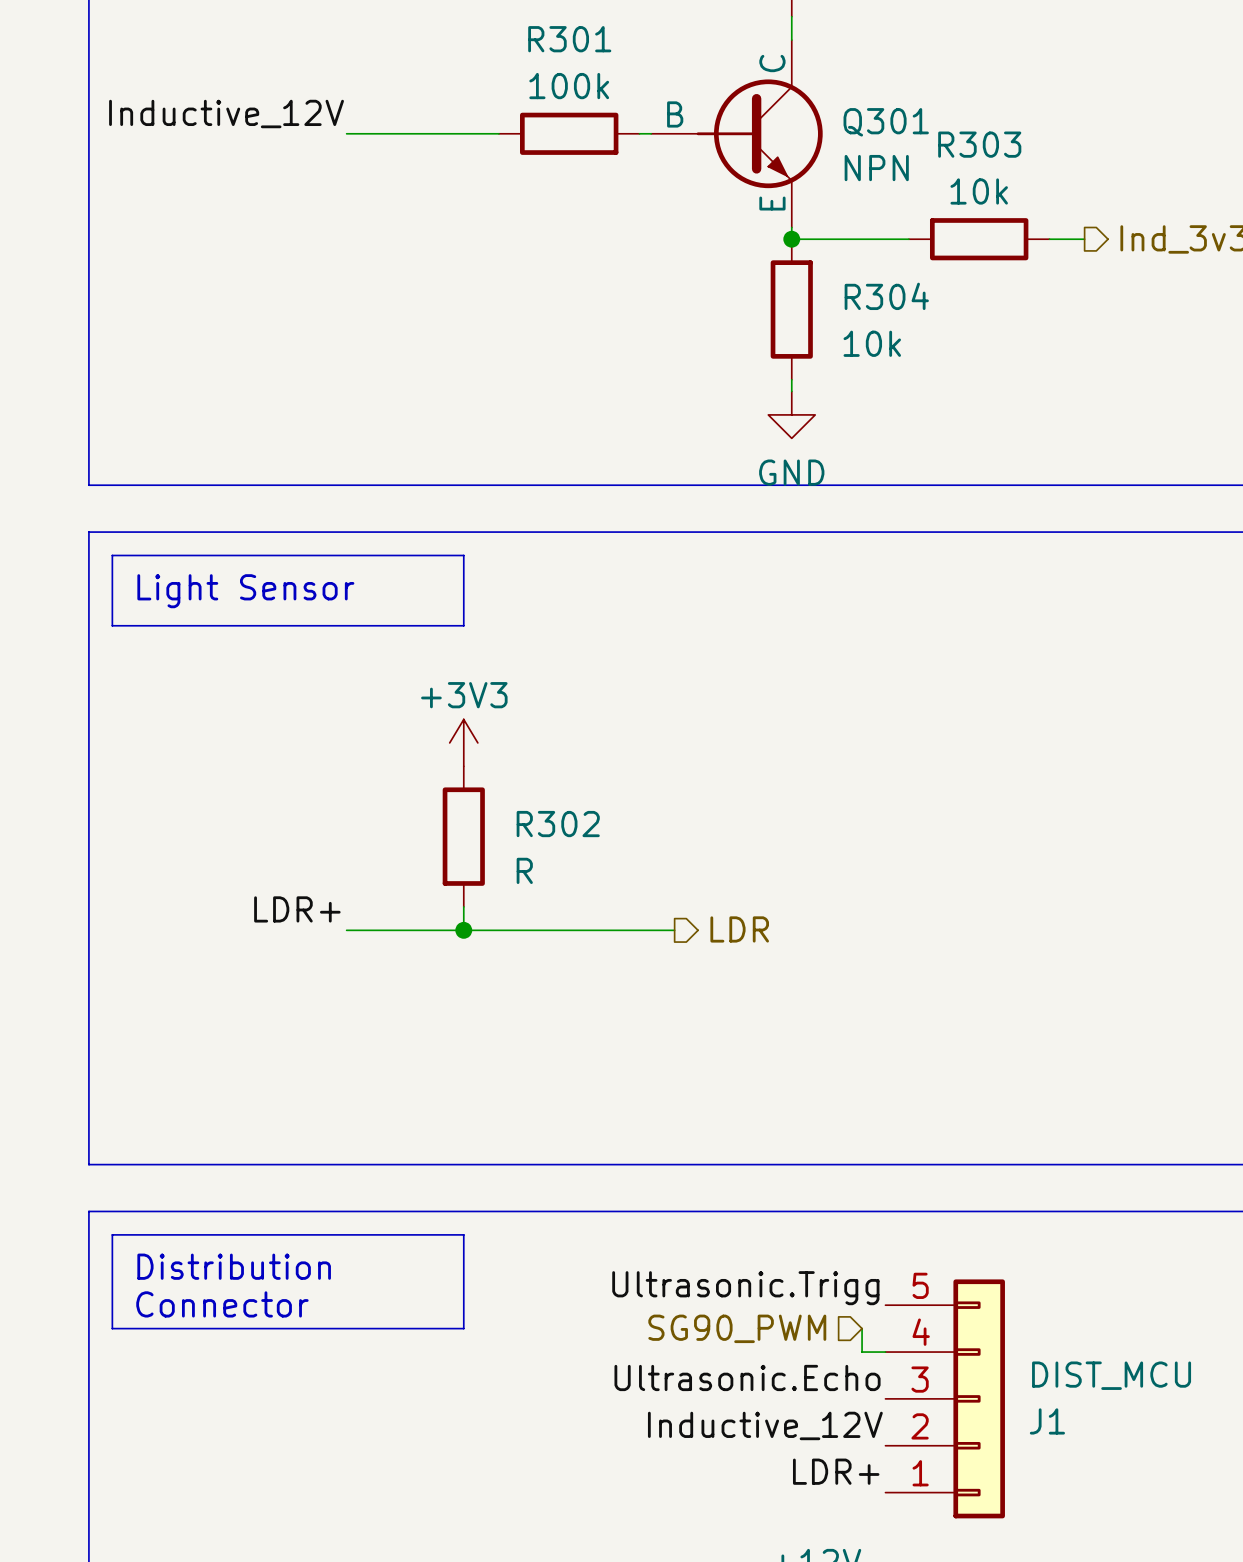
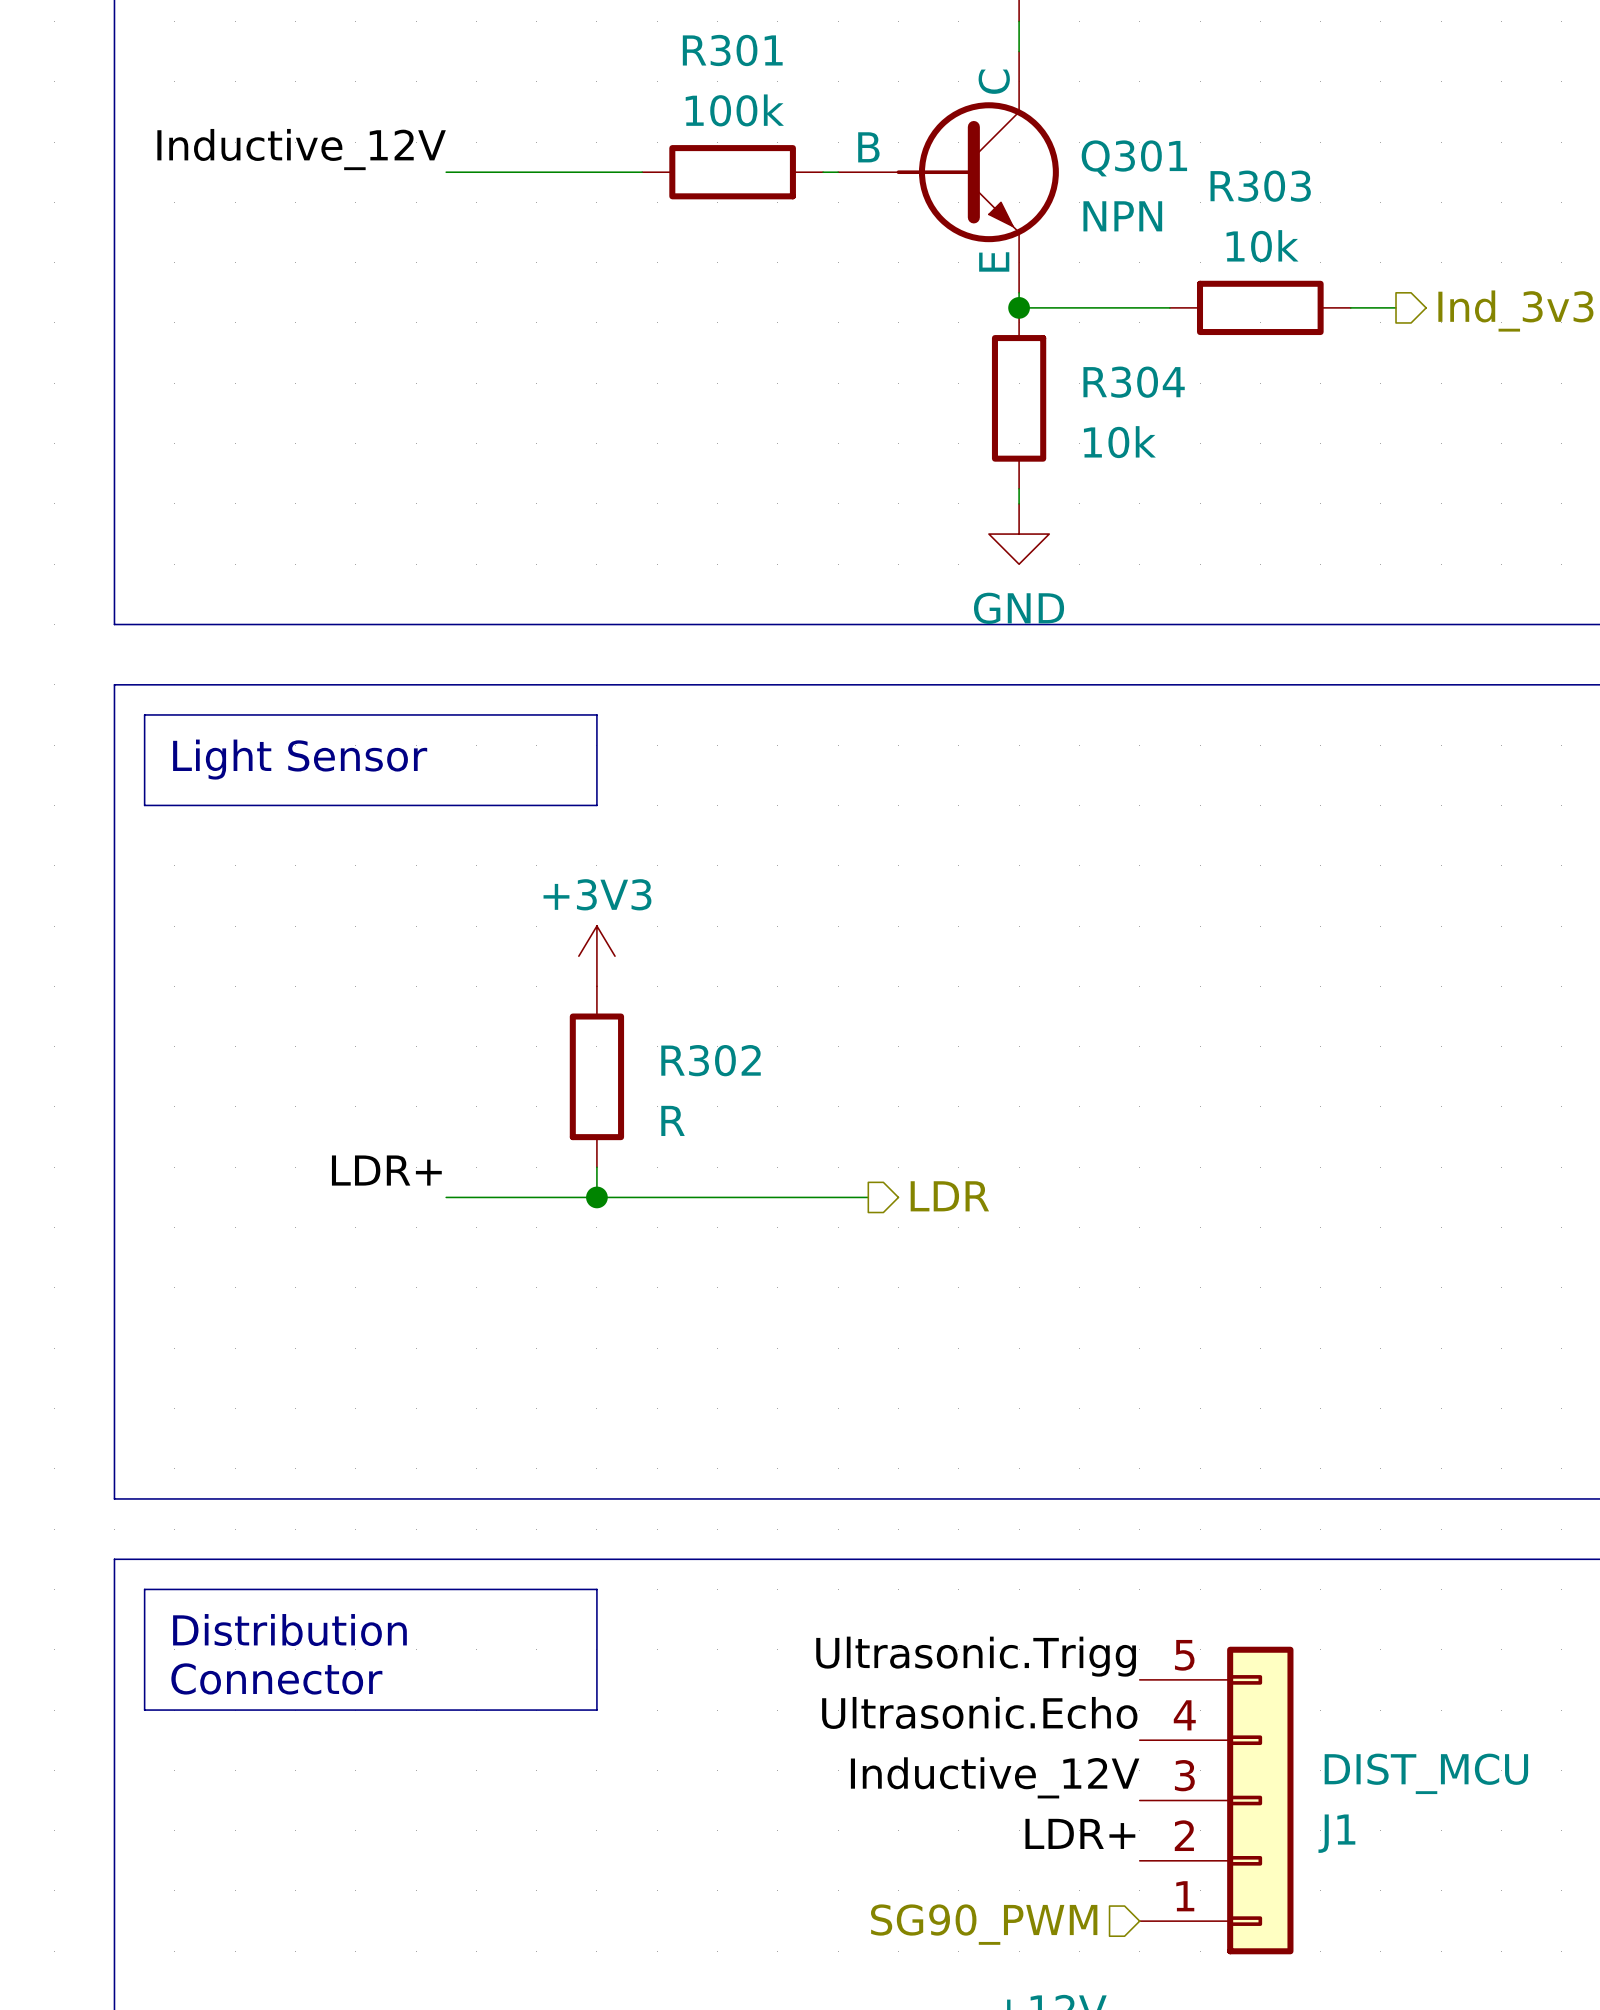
hierarchical label position: SG90_PWM (737, 1328) -> SG90_PWM (984, 1924)
wire: (862, 1328) (862, 1352) (885, 1352) -> none
label: none -> Ultrasonic.Echo (979, 1712)
label: Ultrasonic.Echo (747, 1377) -> Inductive_12V (995, 1777)
label: Inductive_12V (765, 1425) -> LDR+ (1080, 1833)
label: LDR+ (836, 1471) -> none

